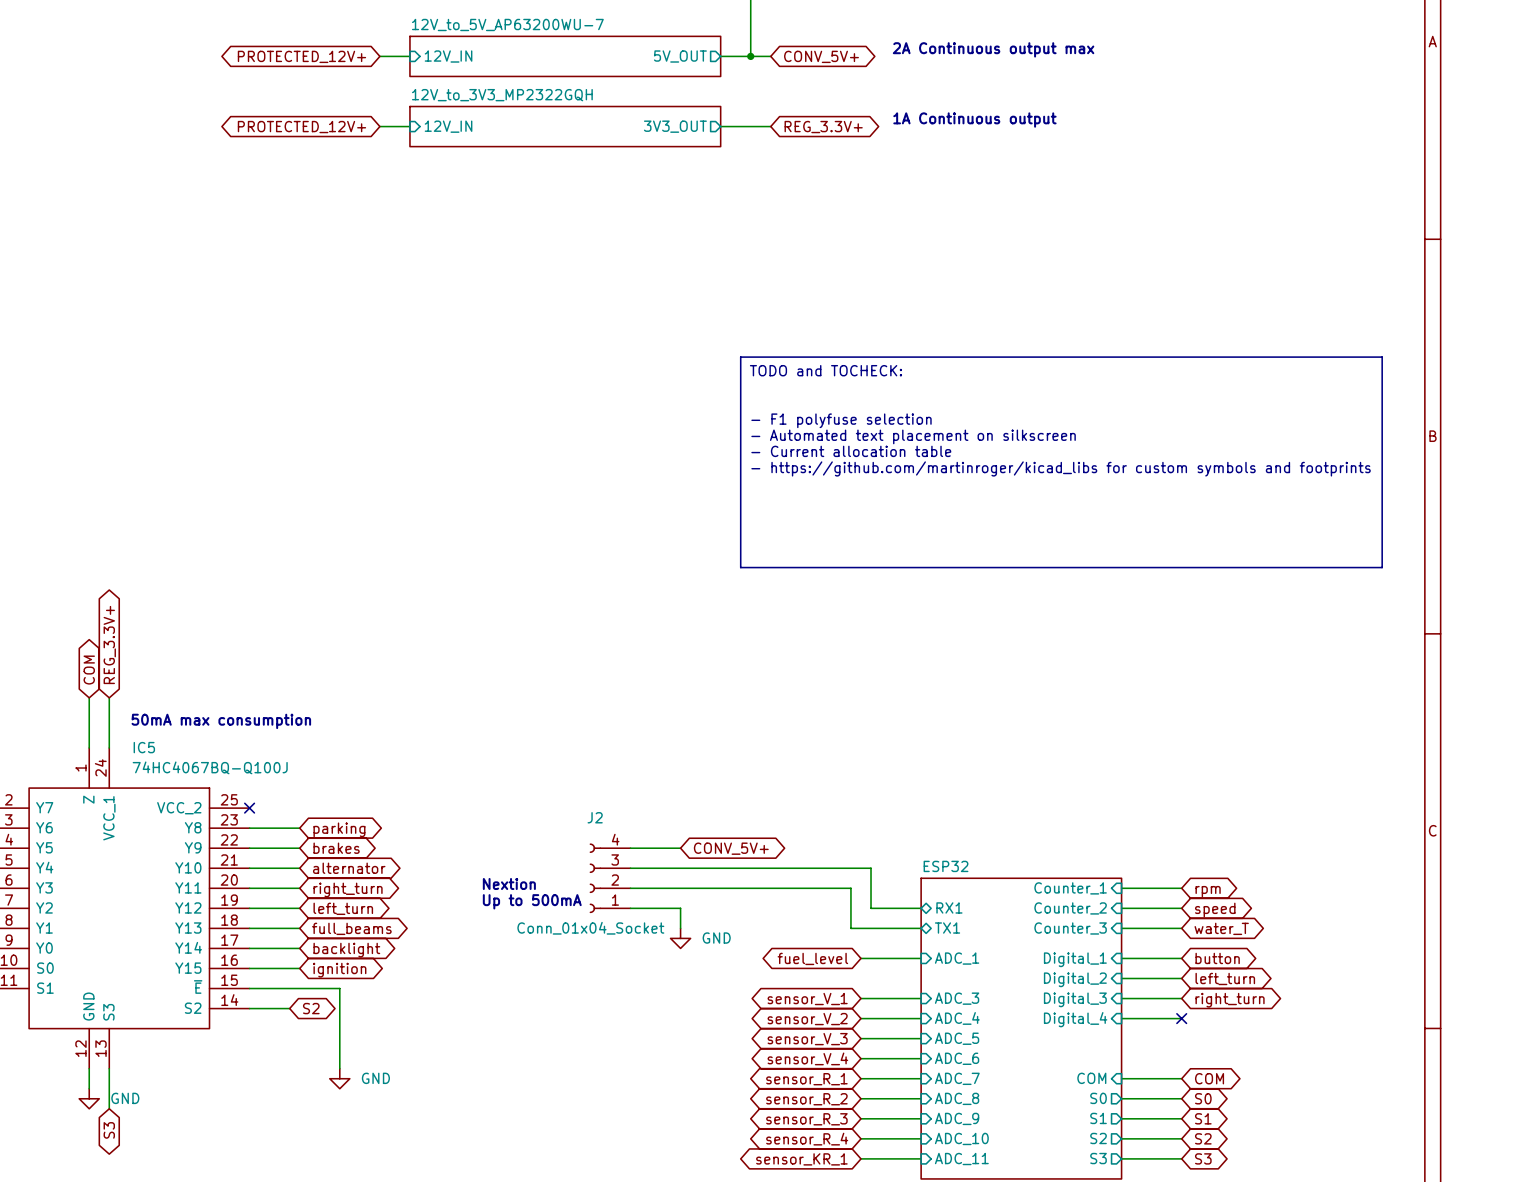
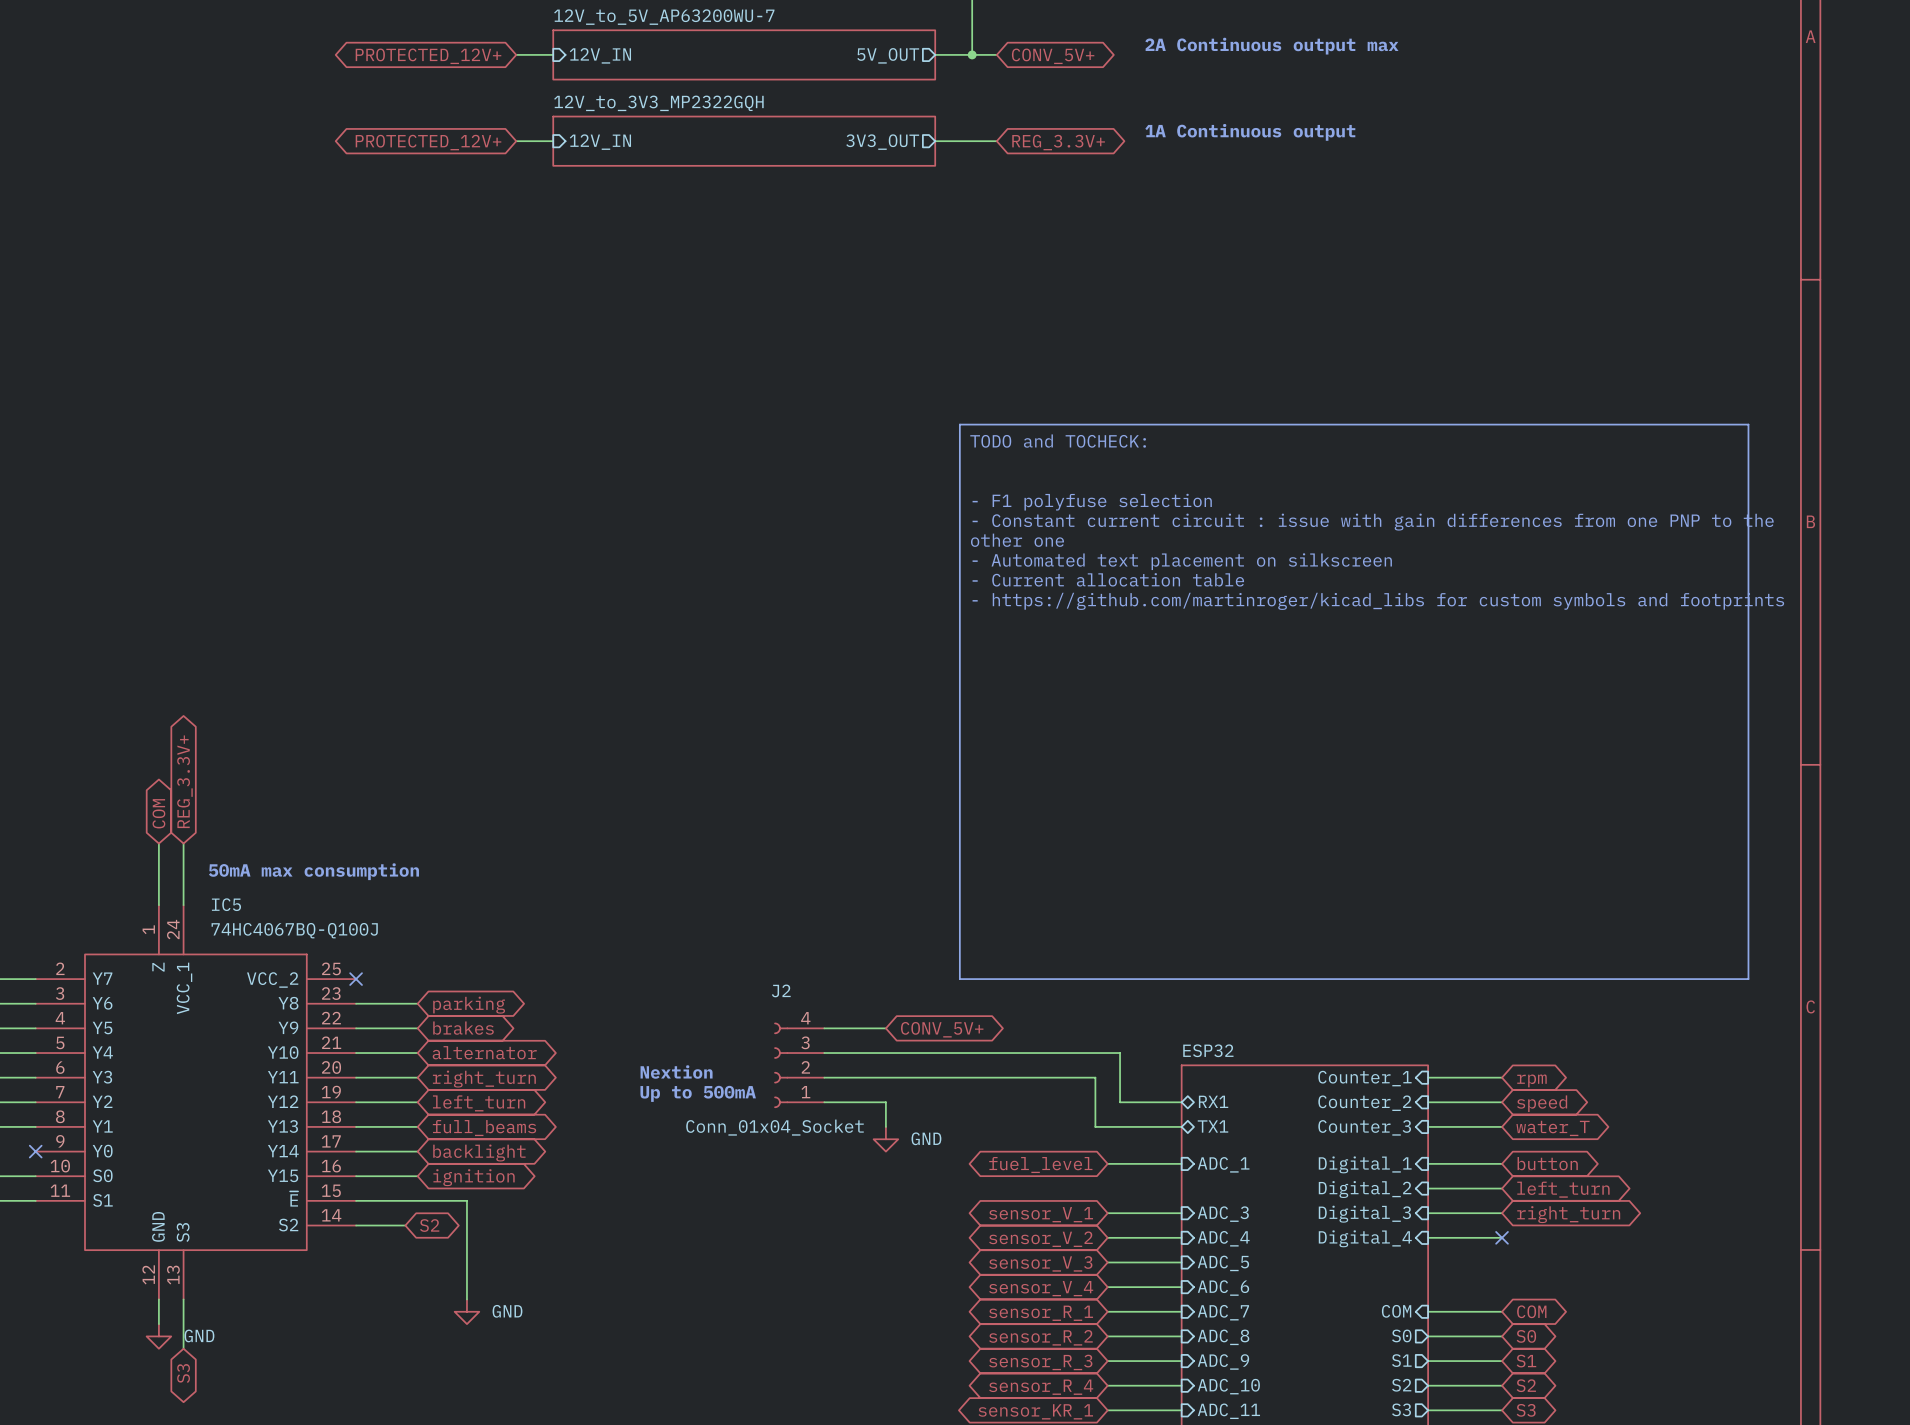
text: - Automated text placement on silkscreen (913, 436) -> - Constant current circuit : issue with gain differences from one PNP to the (1373, 522)
text: - Current allocation table (851, 451) -> other one (1017, 540)
text: - https://github.com/martinroger/kicad_libs for custom symbols and footprints (1061, 468) -> - Automated text placement on silkscreen (1182, 561)
text: none -> - Current allocation table (1108, 579)
text: none -> - https://github.com/martinroger/kicad_libs for custom symbols and footprints (1378, 601)
line: (740, 567) (1382, 567) -> (959, 683) (959, 979) (1748, 979) (1748, 683)

